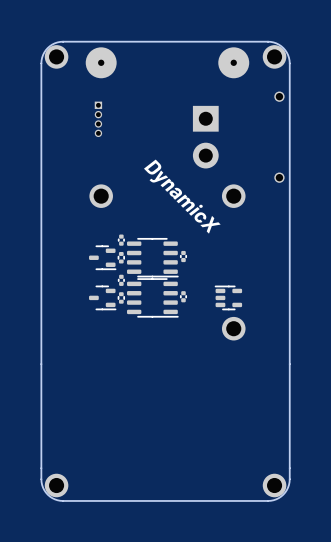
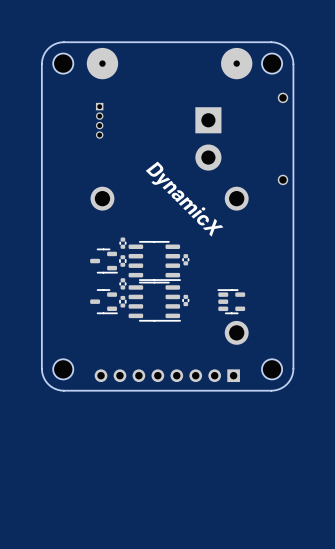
part: (56, 56) -> none
part: (274, 56) -> none
part: none -> (63, 63)
part: none -> (272, 63)
part: none -> (63, 369)
part: none -> (272, 369)
board edge: (289, 364) (289, 482) (286, 490) (281, 496) (268, 500) (63, 500) (52, 498) (44, 490) (41, 482) (41, 364) -> (293, 368) (291, 377) (286, 384) (279, 389) (271, 390) (61, 390) (48, 384) (43, 377) (41, 368)
part: none -> (167, 375)
part: (56, 485) -> none
part: (274, 485) -> none

